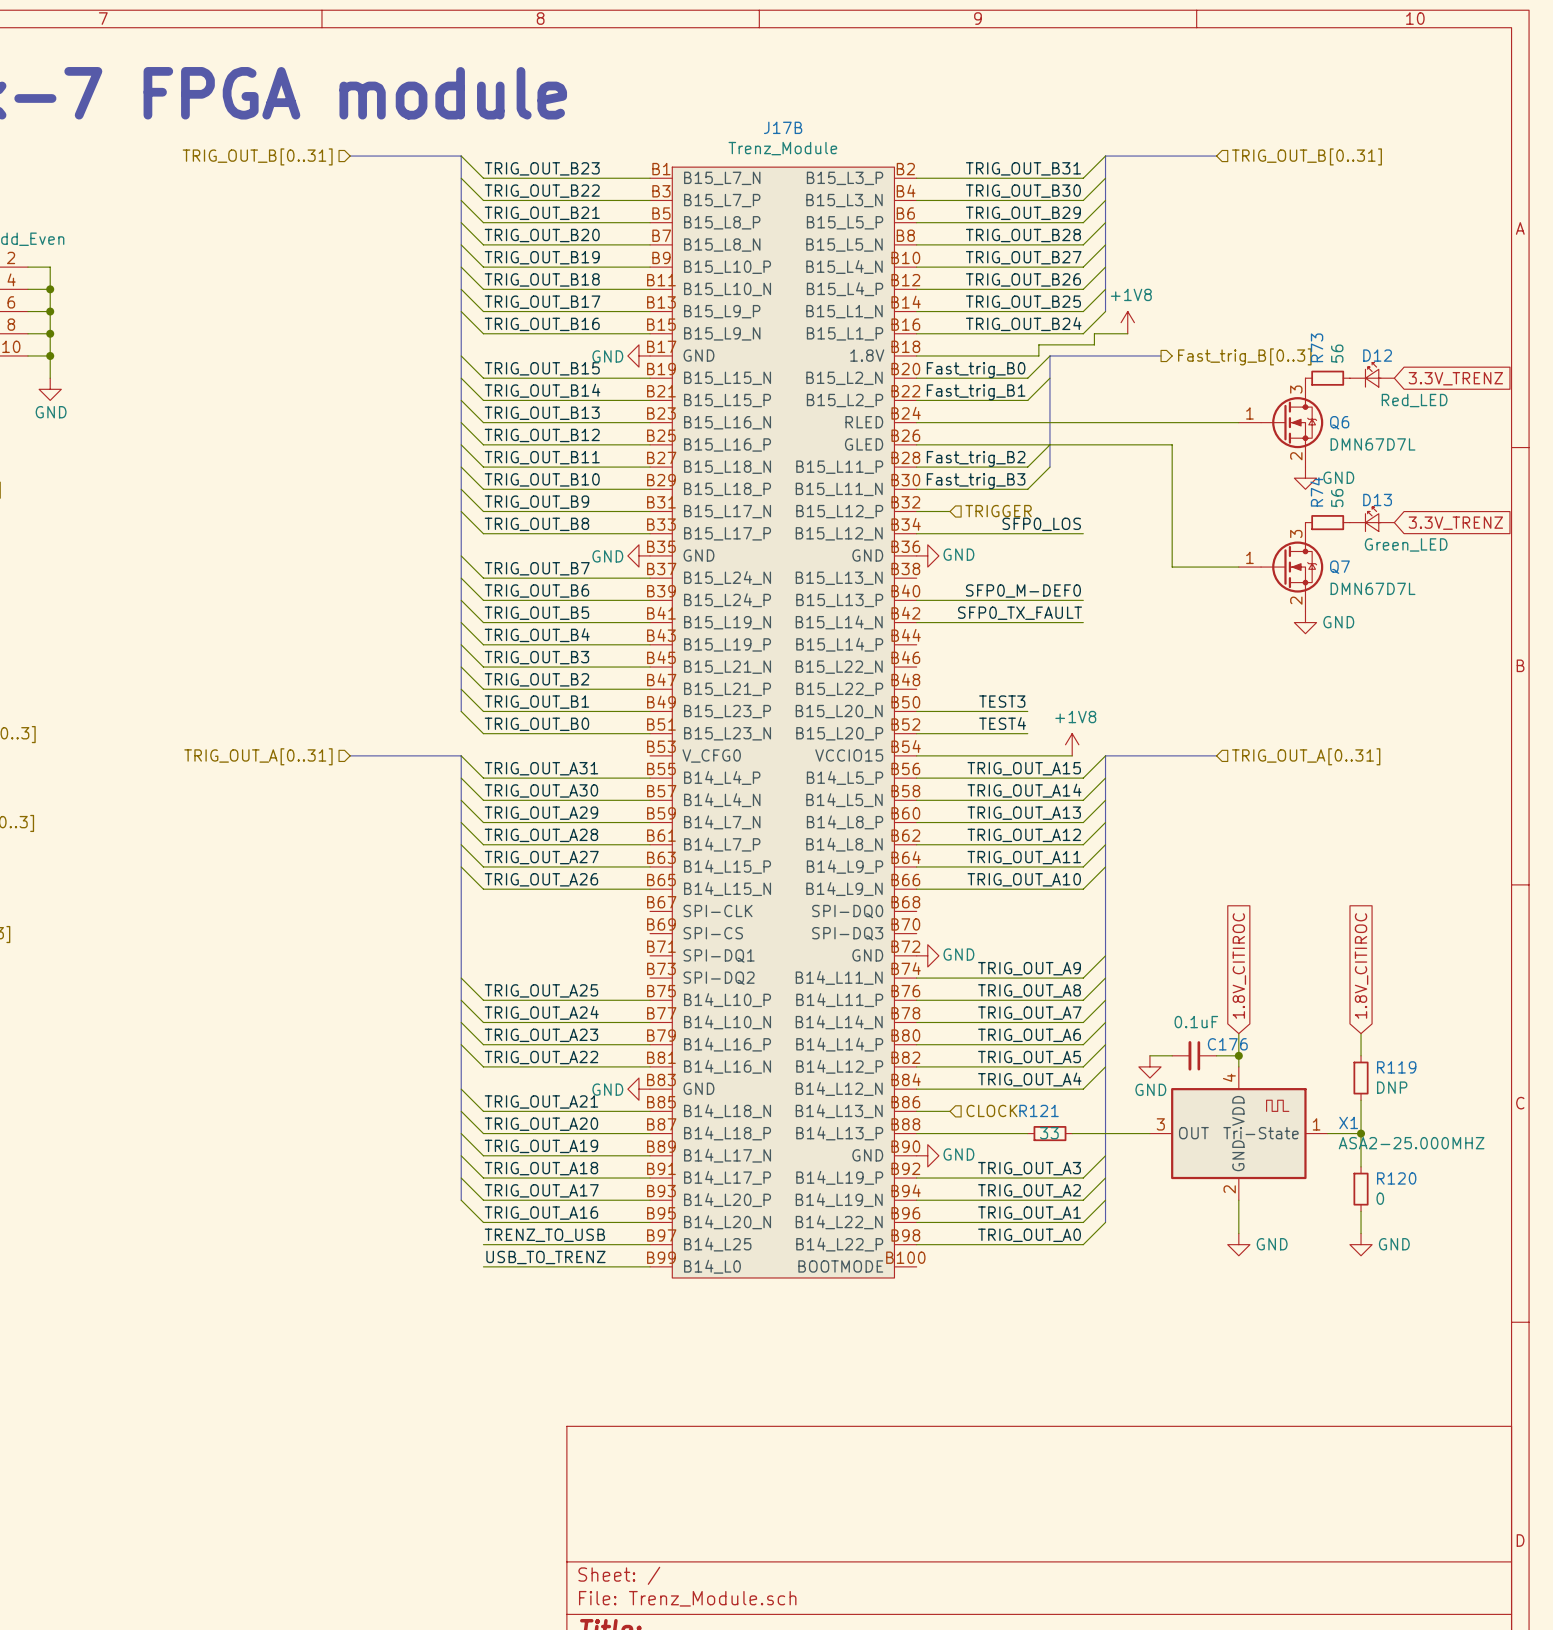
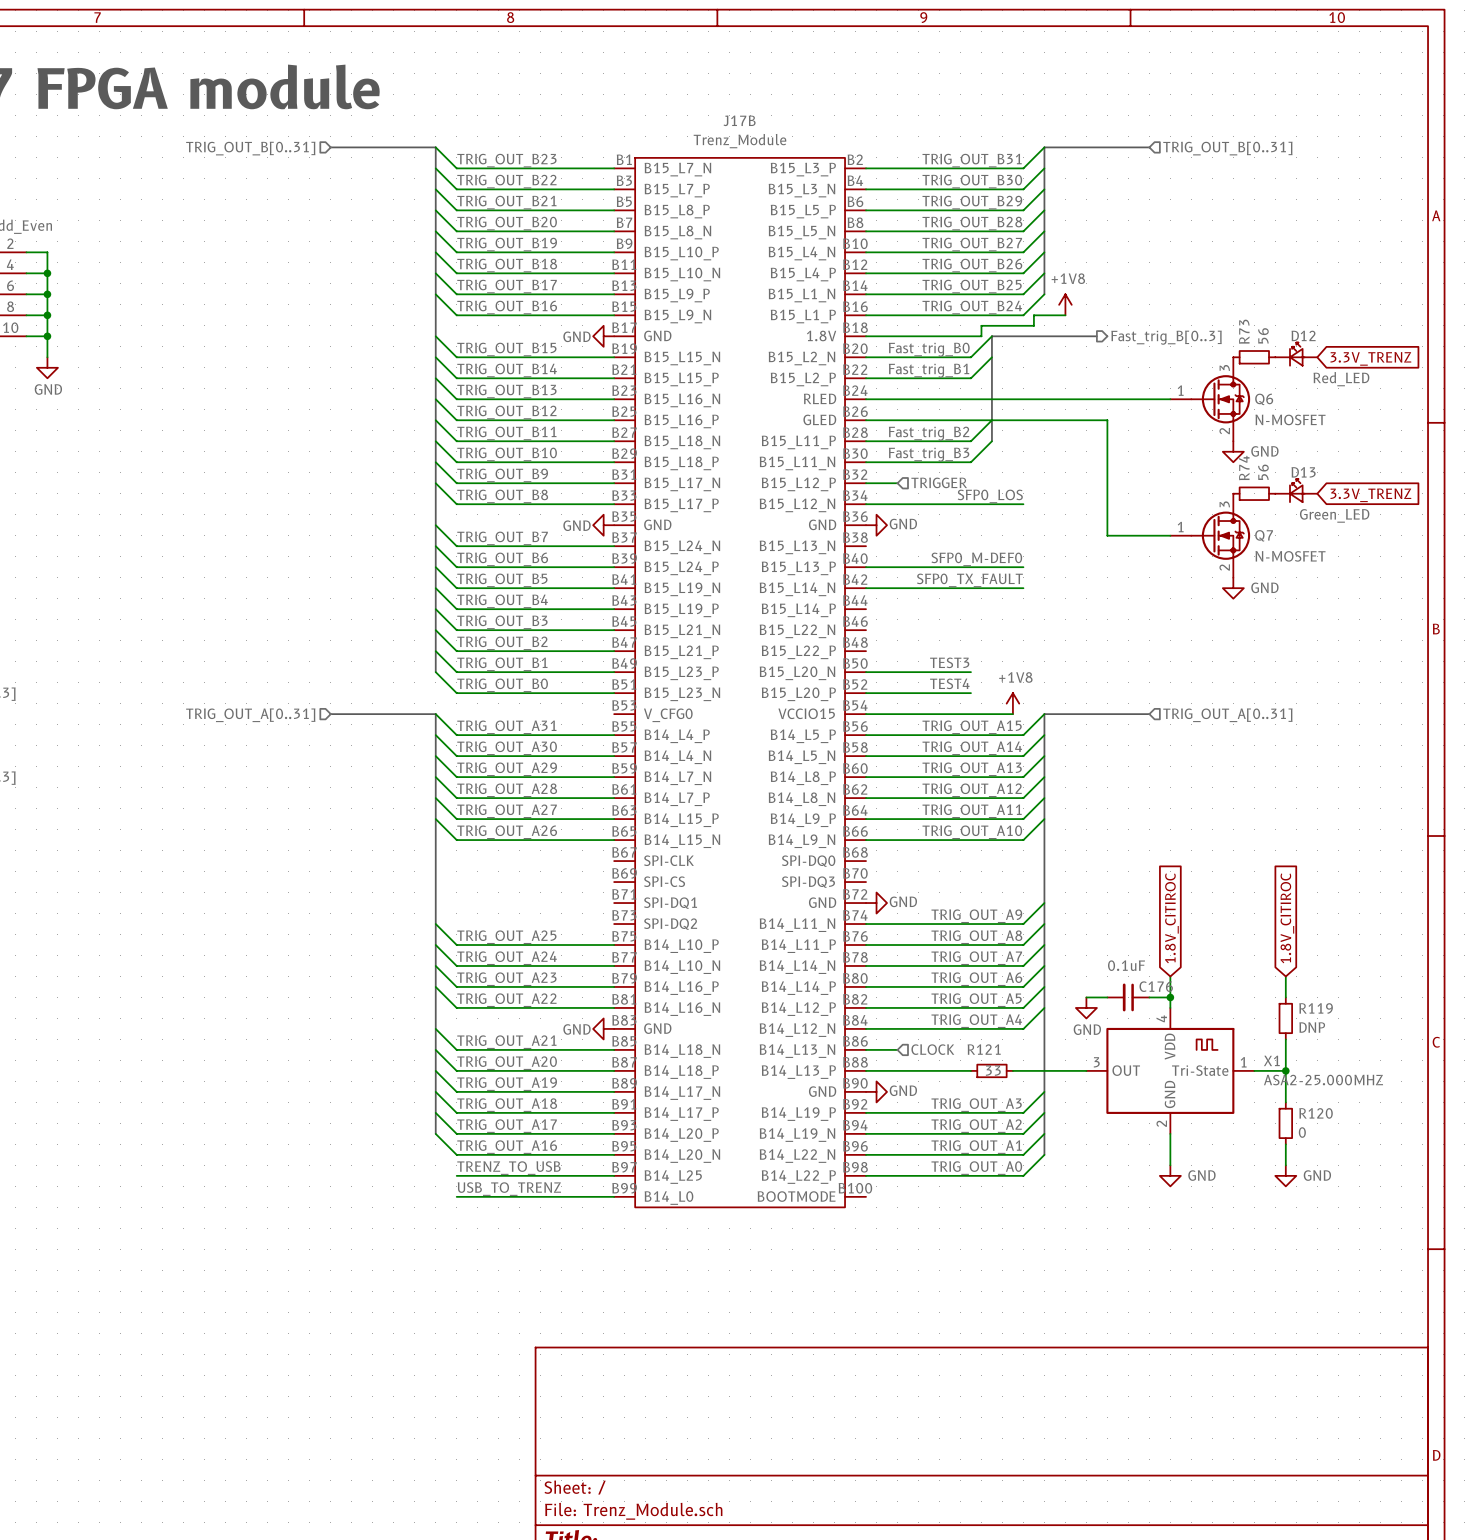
Q6 value: DMN67D7L (1373, 444) -> N-MOSFET (1290, 419)
Q7 value: DMN67D7L (1373, 588) -> N-MOSFET (1290, 556)

